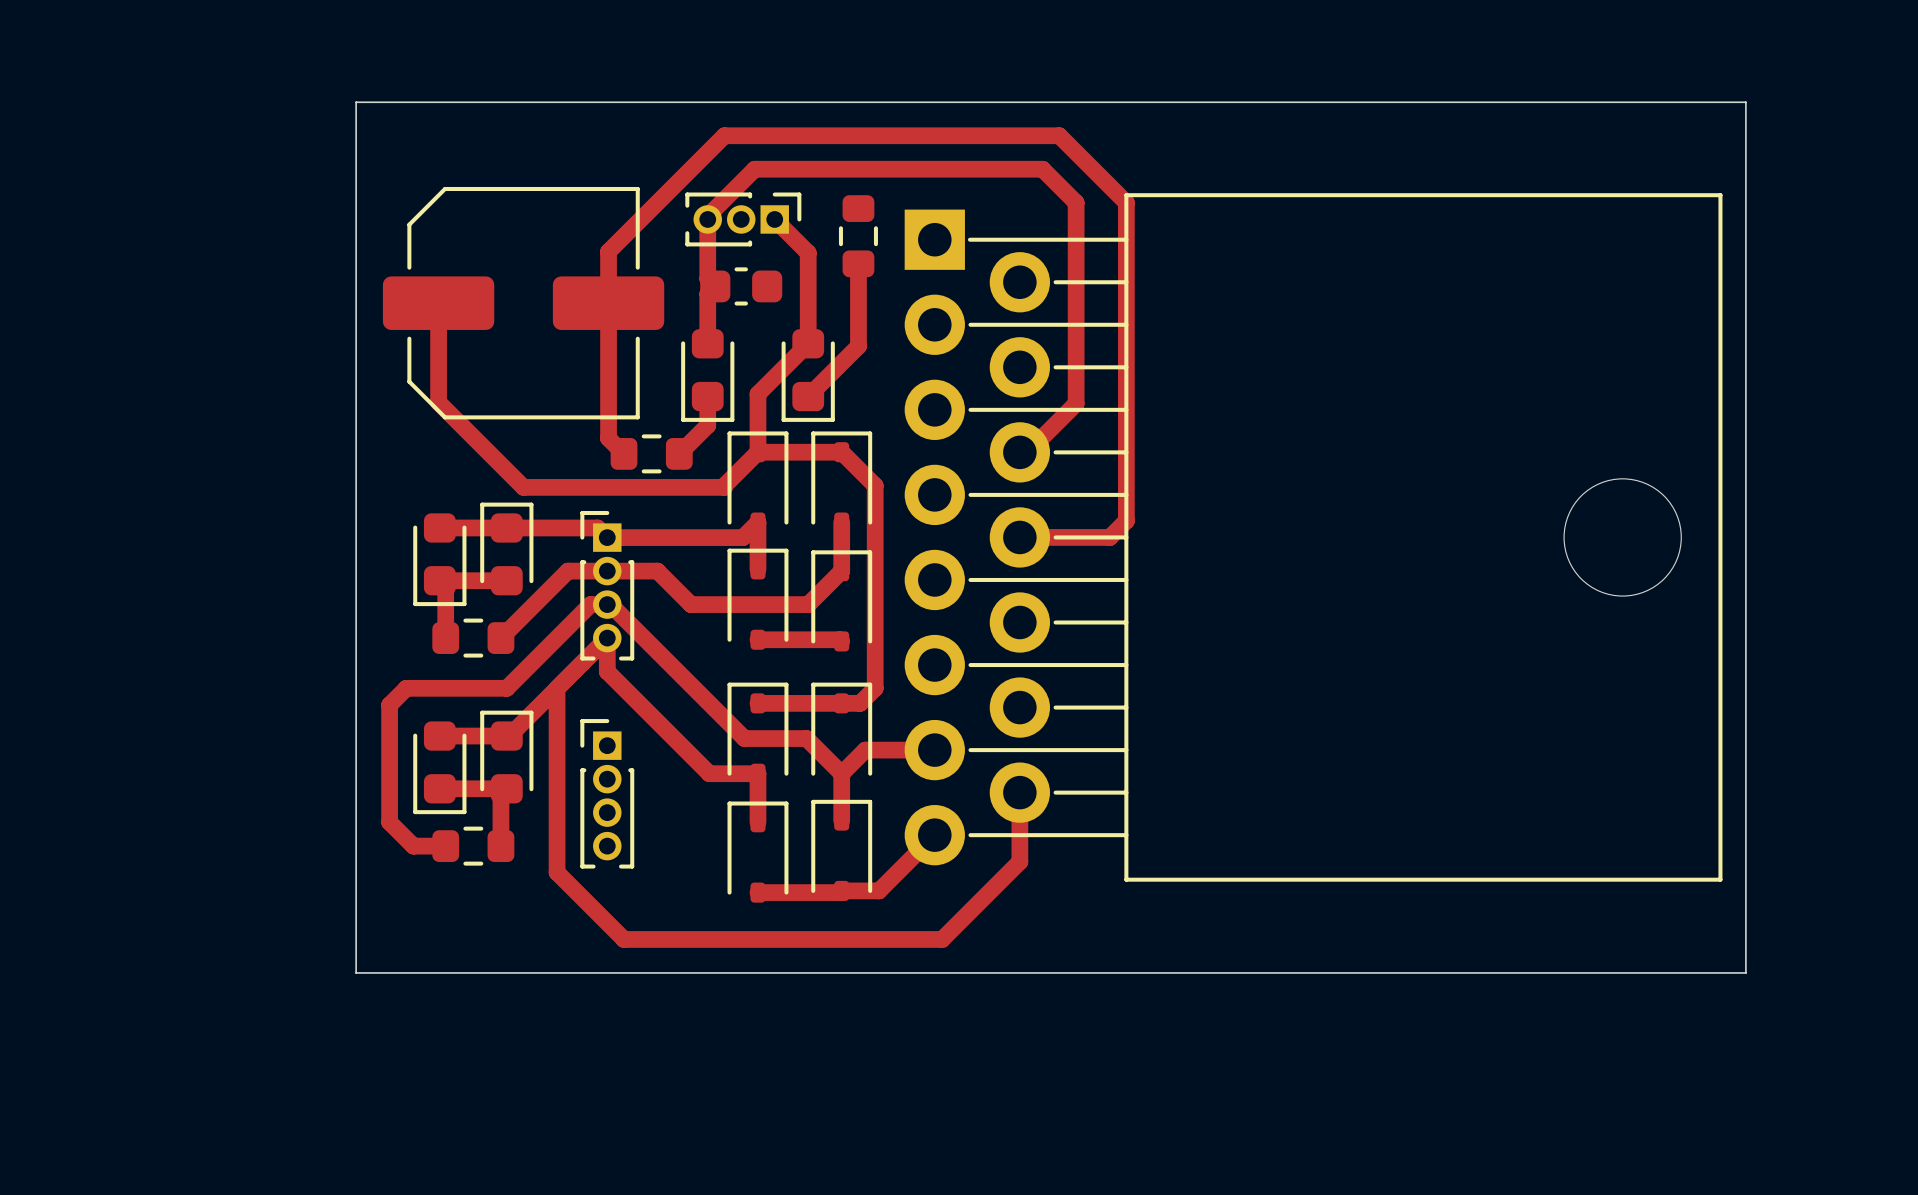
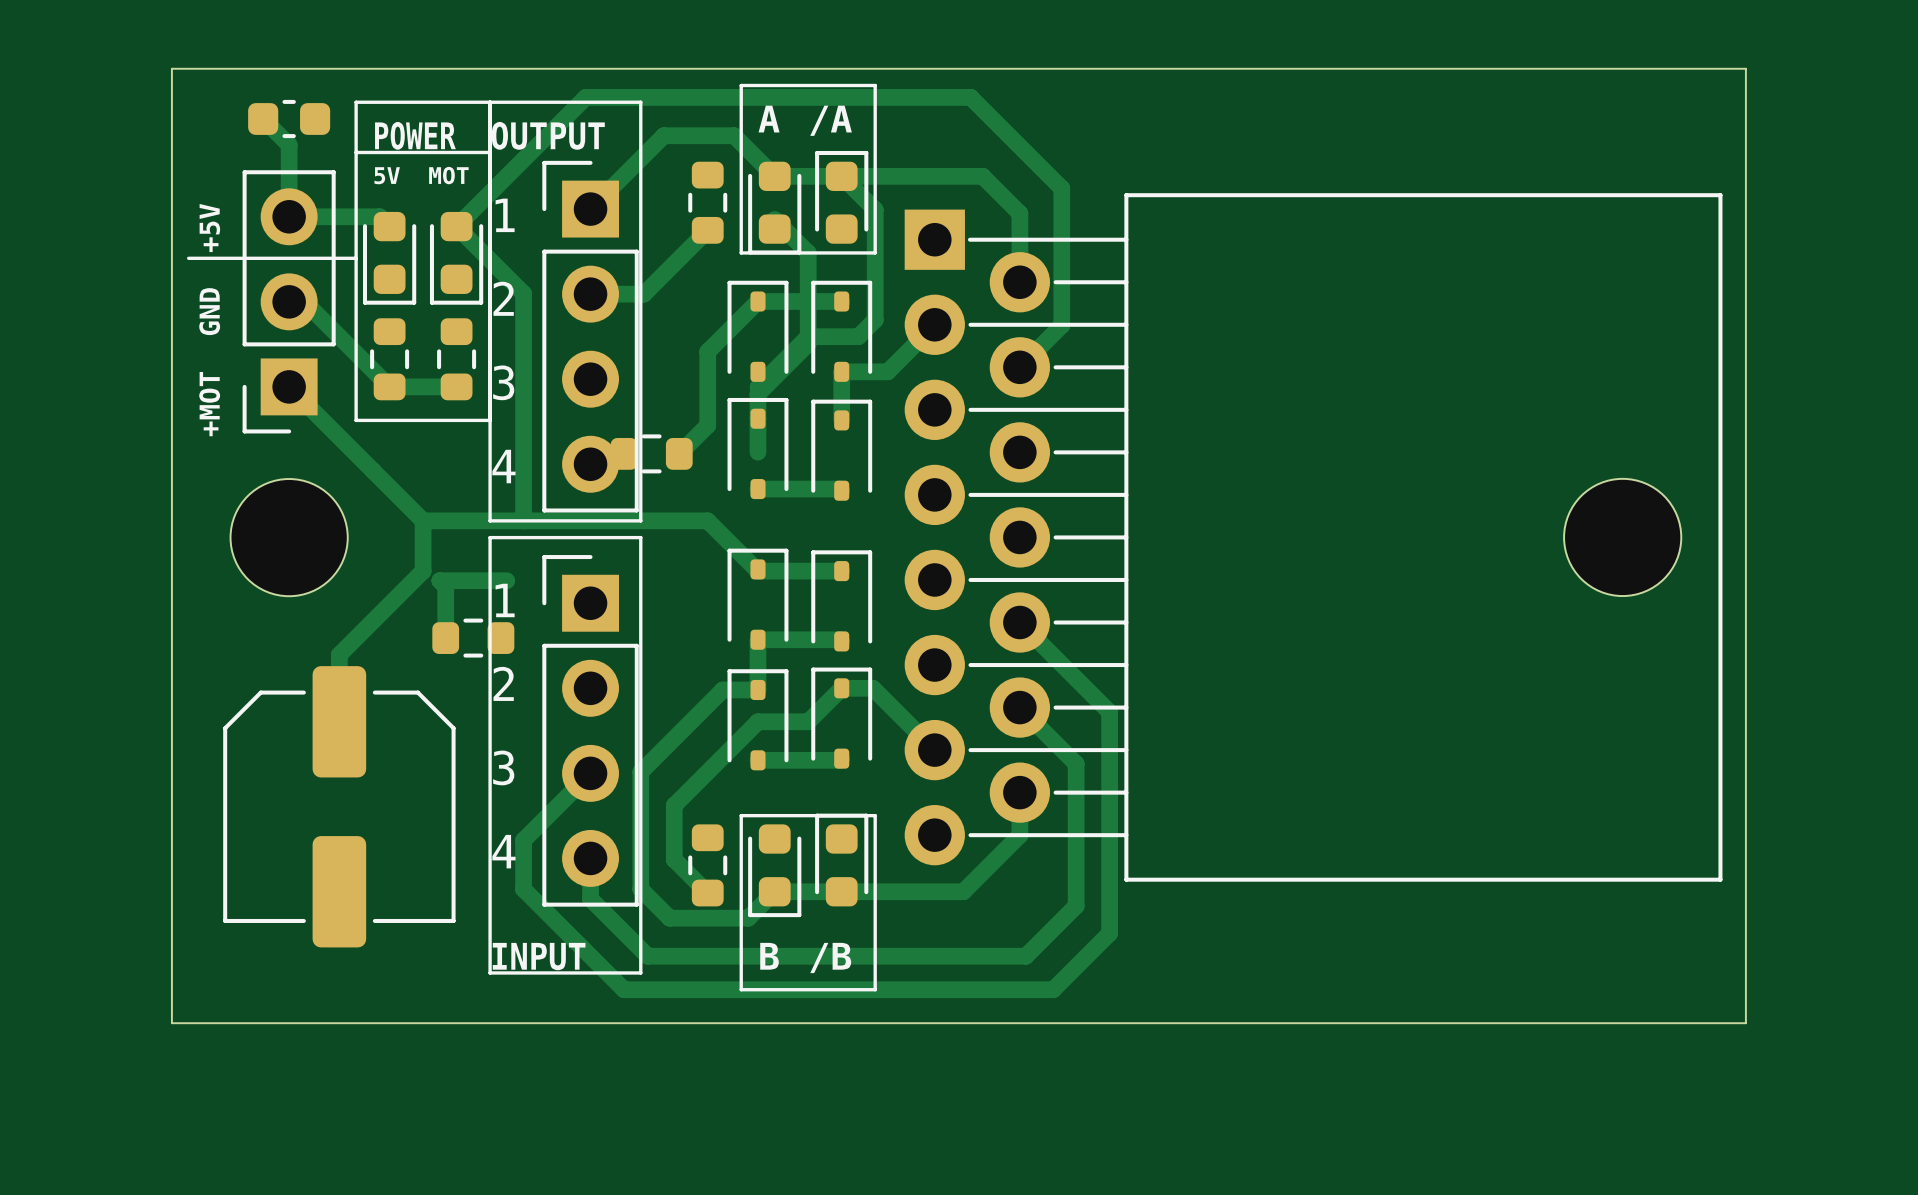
line: none -> (741, 85) (741, 252) (875, 252) (875, 85) (741, 85)
line: none -> (490, 102) (490, 520) (640, 520) (640, 102) (356, 102) (356, 420) (490, 420)
board edge: (1745, 102) (356, 102) (356, 972) (1745, 972) -> (1745, 102) (1745, 68) (171, 68) (171, 1023) (1745, 1023) (1745, 972)
track: none -> (263, 118) (289, 144) (289, 216) (379, 216) (389, 226)
text: none -> A (769, 119)
text: none -> /A (831, 120)
text: none -> POWER (415, 135)
text: none -> OUTPUT (548, 135)
track: (724, 135) (608, 251) (608, 438) (624, 453) -> (724, 135) (663, 135) (590, 209)
track: (734, 135) (1059, 135) (1126, 202) (1126, 520) (1109, 537) -> (734, 135) (774, 176) (982, 176) (1019, 213) (1019, 282)
line: none -> (356, 152) (490, 152)
track: (1042, 169) (754, 169) (707, 216) (707, 278) (715, 286) (707, 293) (707, 343) -> (1042, 169) (970, 97) (585, 97) (456, 226) (523, 293) (523, 520)
text: none -> 5V MOT (421, 175)
track: none -> (841, 176) (875, 209) (875, 319) (858, 336) (808, 336) (757, 386)
track: (1061, 188) (1076, 202) (1076, 403) (1027, 452) (1019, 452) -> (1061, 188) (1061, 325) (1019, 367)
part: none -> (841, 197)
part: none -> (774, 208)
text: none -> 1 (505, 215)
text: none -> +5V (209, 228)
part: (743, 219) -> none
track: none -> (707, 230) (643, 294) (590, 294)
part position: (858, 236) -> (707, 202)
line: none -> (188, 258) (356, 258)
part: none -> (389, 258)
part: none -> (456, 258)
track: (858, 263) (858, 346) (808, 396) -> none
part position: (741, 286) -> (289, 118)
text: none -> 2 (503, 298)
track: none -> (289, 301) (304, 301) (389, 386) (456, 386)
part: none -> (289, 301)
track: none -> (841, 301) (757, 301) (707, 351) (707, 396)
text: none -> GND (209, 311)
track: (438, 303) (438, 402) (523, 487) (724, 487) (757, 452) (841, 452) (875, 485) (875, 688) (860, 703) (757, 703) -> none
part rotation: 0° (523, 303) -> 90° clockwise (339, 806)
part position: (523, 303) -> (339, 806)
track: none -> (934, 324) (887, 371) (841, 371) (841, 420)
part: none -> (757, 331)
part: none -> (841, 331)
part: none -> (590, 336)
part: none -> (389, 359)
part: none -> (456, 359)
part: (707, 375) -> none
part: (808, 375) -> none
text: none -> 3 (503, 382)
track: none -> (289, 386) (423, 520)
text: none -> +MOT (209, 404)
text: none -> 4 (503, 466)
part position: (757, 482) -> (757, 448)
part position: (841, 482) -> (841, 450)
track: none -> (757, 489) (840, 489) (841, 490)
track: none -> (423, 520) (707, 520) (757, 571) (841, 571)
track: none -> (423, 520) (423, 571) (339, 654) (339, 721)
track: (841, 522) (841, 571) (808, 604) (691, 604) (657, 571) (567, 571) (500, 638) -> none
track: (439, 527) (597, 527) (607, 537) (742, 537) (757, 522) (757, 569) -> none
part: none -> (289, 537)
line: none -> (490, 537) (490, 972) (640, 972) (640, 537) (490, 537)
track: (1019, 537) (1109, 537) -> none
part: (506, 548) -> none
part: (439, 559) -> none
part: (607, 585) -> none
text: none -> 1 (505, 600)
track: none -> (1019, 622) (1109, 712) (1109, 933) (1053, 989) (624, 989) (523, 889) (523, 840) (590, 773)
text: none -> 2 (503, 683)
track: (557, 688) (557, 872) (624, 939) (942, 939) (1019, 861) (1019, 835) -> (757, 641) (757, 689) (722, 689) (640, 772) (640, 889) (669, 918) (748, 918) (774, 891) (963, 891) (1019, 835)
track: none -> (1019, 707) (1076, 763) (1076, 905) (1025, 956) (647, 956) (590, 898) (590, 858)
part: none -> (590, 730)
part position: (757, 733) -> (757, 719)
part position: (841, 733) -> (841, 718)
track: (439, 736) (509, 736) (607, 638) (607, 671) (709, 773) (757, 773) (757, 822) -> none
track: (934, 750) (865, 750) (841, 773) -> (934, 750) (873, 688) (841, 688) (808, 721) (757, 721) (674, 805) (674, 859) (707, 893)
part: (506, 757) -> none
track: none -> (841, 758) (840, 760) (757, 760)
part: (439, 767) -> none
text: none -> 3 (503, 767)
track: (841, 773) (841, 820) -> none
track: (841, 773) (806, 738) (744, 738) (610, 604) (590, 604) (506, 688) (406, 688) (389, 705) (389, 822) (413, 846) (445, 846) -> none
track: (439, 788) (506, 788) (500, 794) (500, 846) -> none
part: (607, 793) -> none
part footprint: [811, 799, 873, 901] -> [815, 813, 869, 907]
part footprint: [727, 801, 789, 903] -> [748, 824, 802, 918]
line: none -> (741, 815) (875, 815) (875, 989) (741, 989) (741, 815)
track: (934, 835) (879, 890) (757, 892) -> none
part rotation: 0° (473, 846) -> 90° clockwise (707, 865)
part position: (473, 846) -> (707, 865)
text: none -> 4 (503, 851)
text: none -> INPUT (539, 956)
text: none -> B (769, 956)
text: none -> /B (830, 957)

